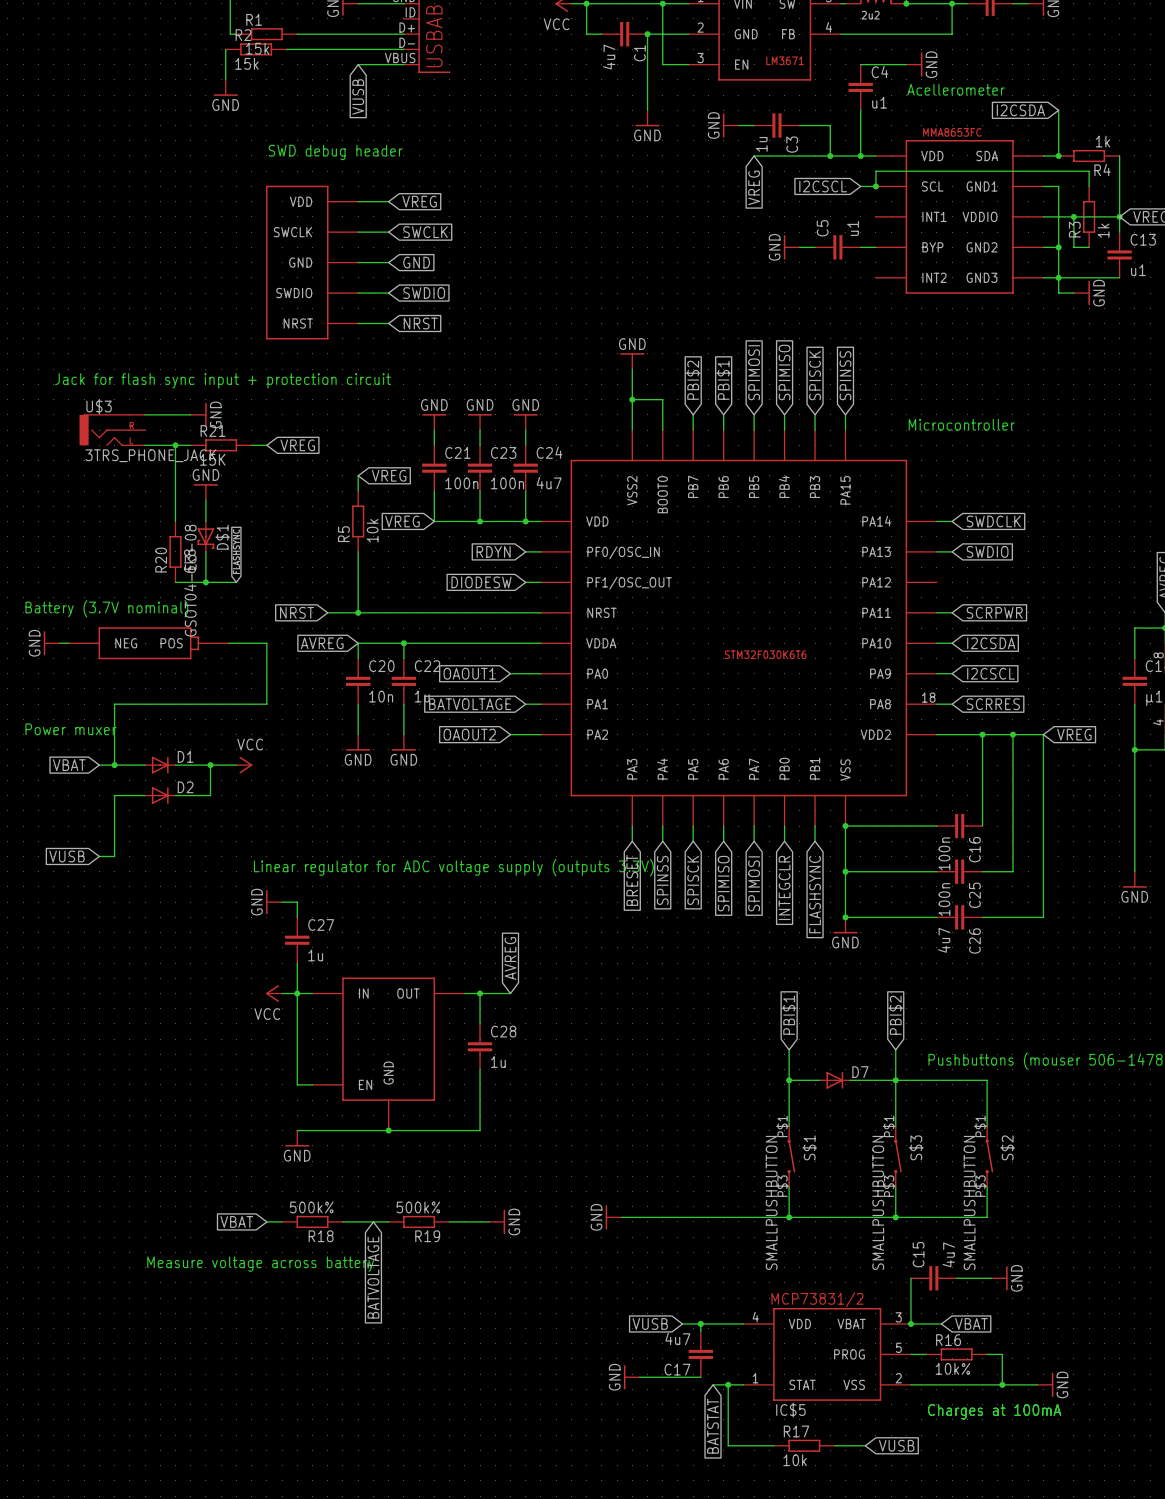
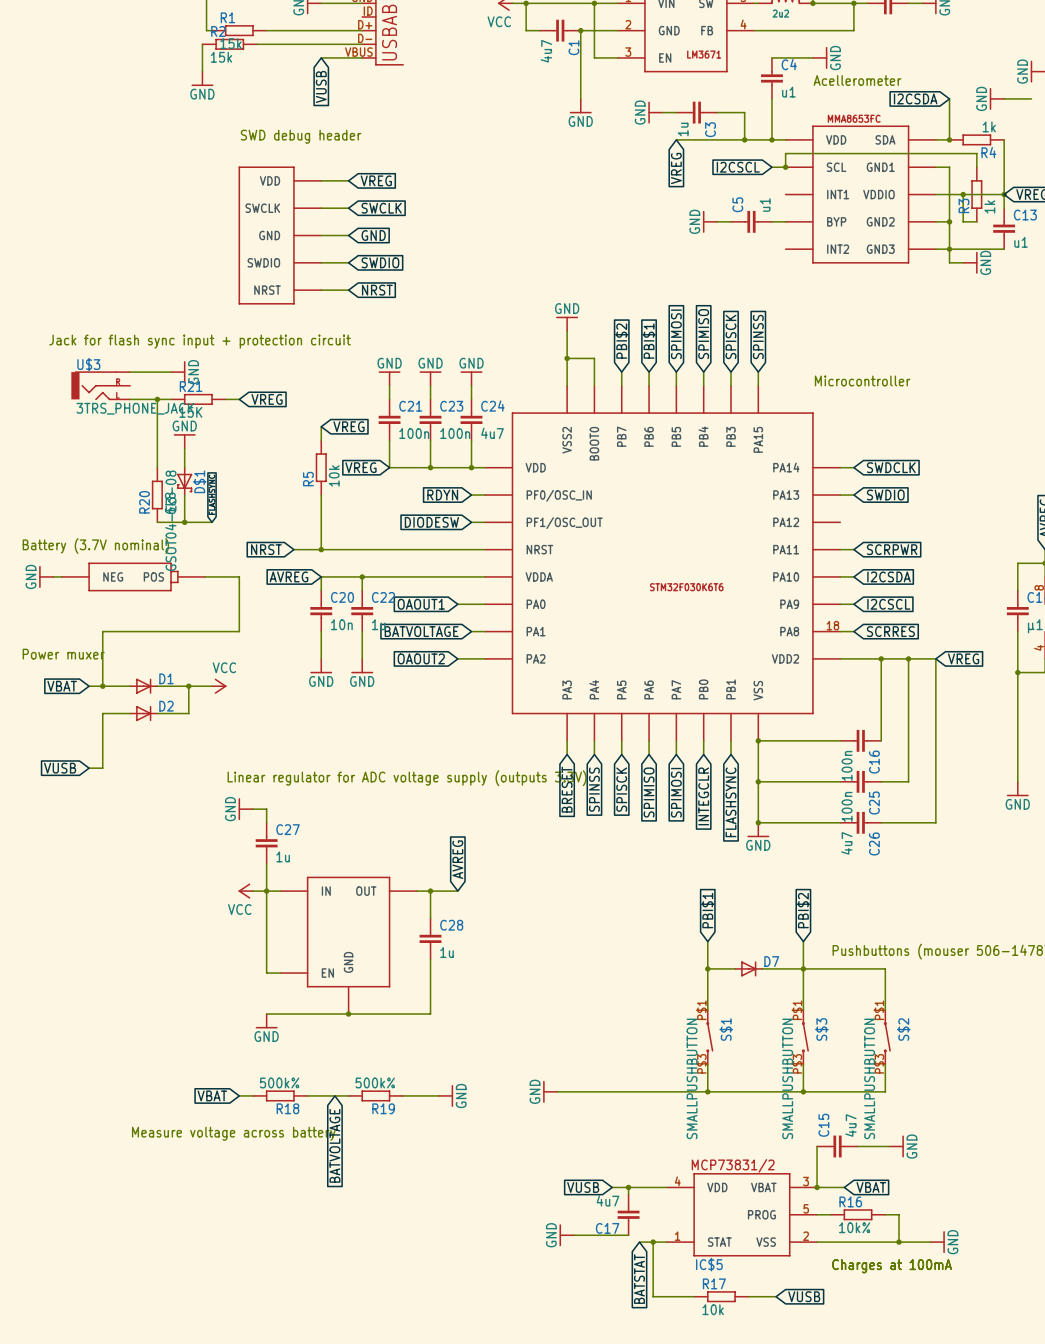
power symbol: none -> GND (1037, 71)
power symbol: none -> GND (996, 98)
wire: none -> (1004, 98) (1031, 98)

